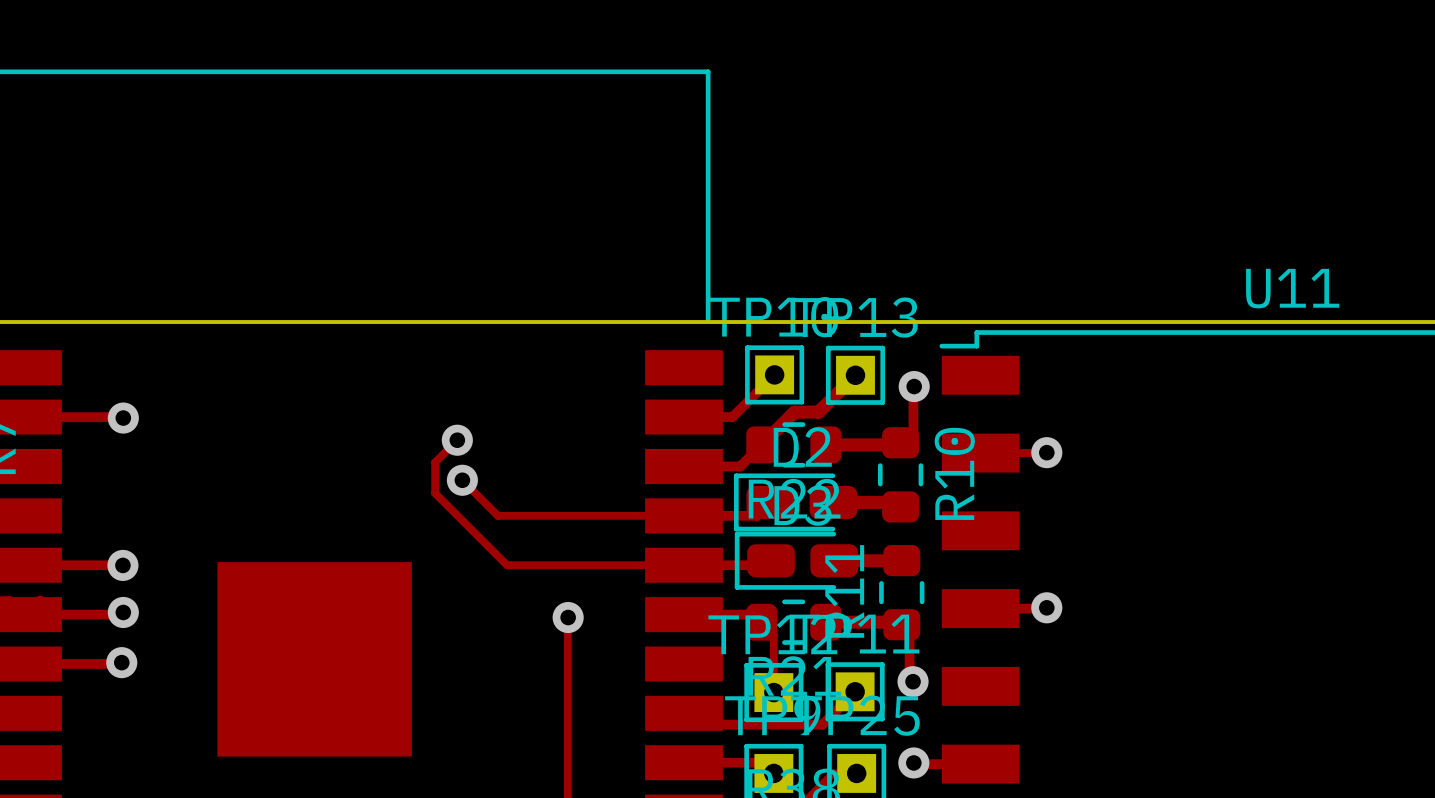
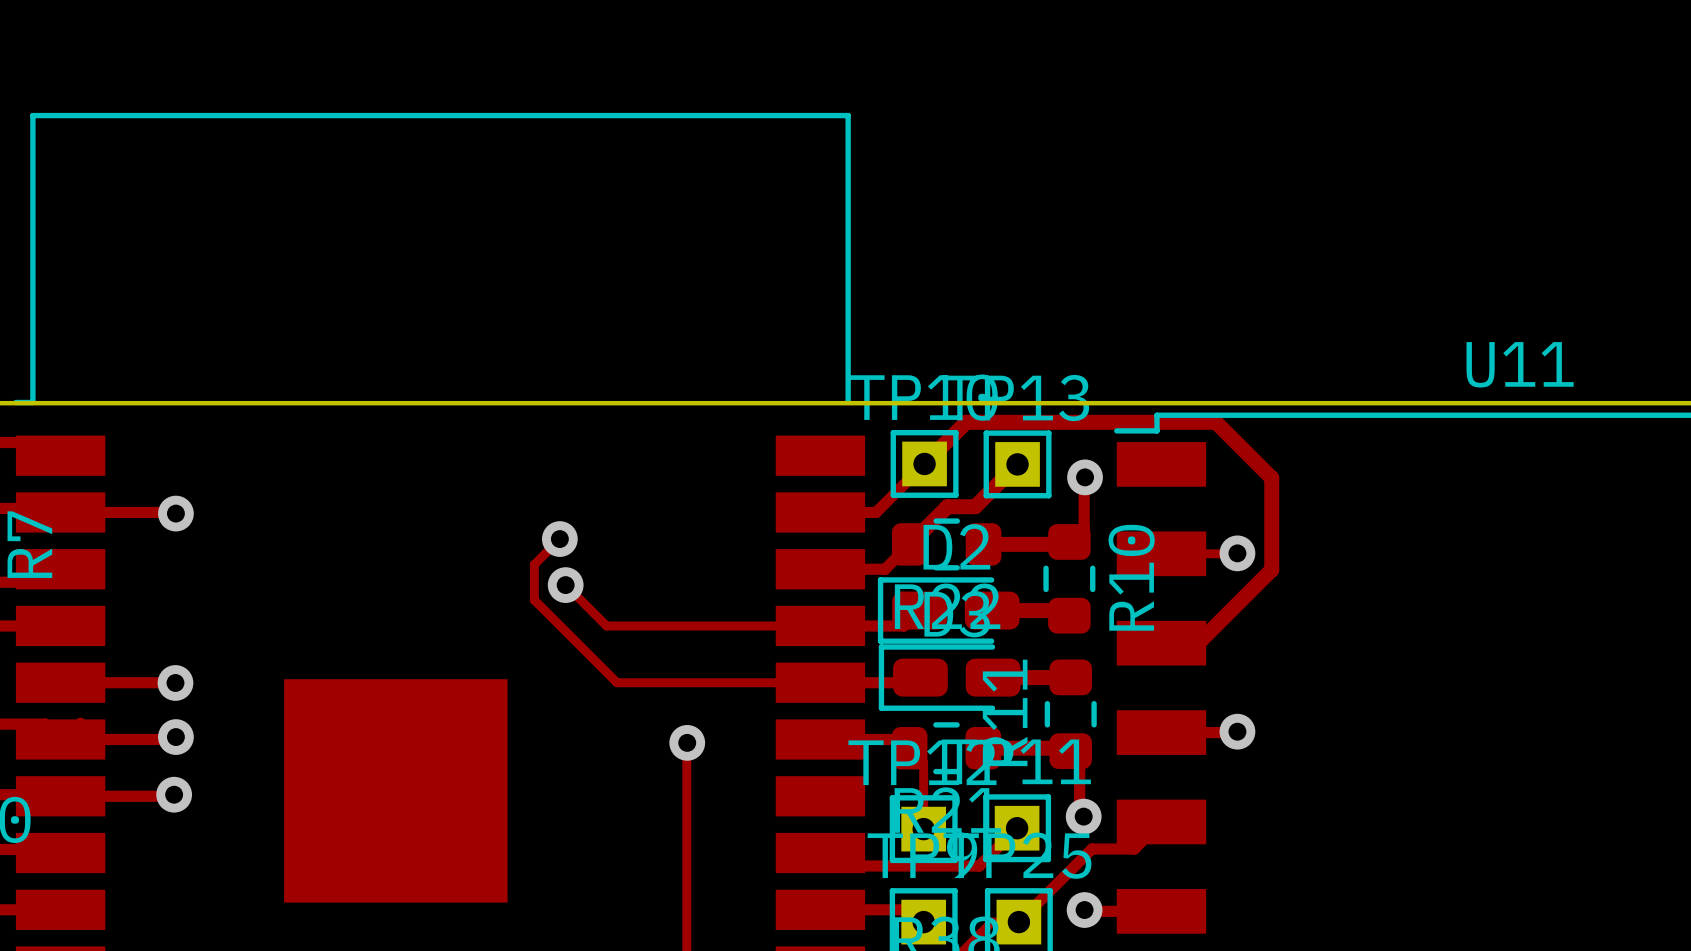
track: none -> (924, 463) (966, 422) (1215, 422) (1271, 478) (1271, 569) (1198, 643)
track: none -> (1161, 821) (1134, 849) (1091, 849) (1018, 922)

